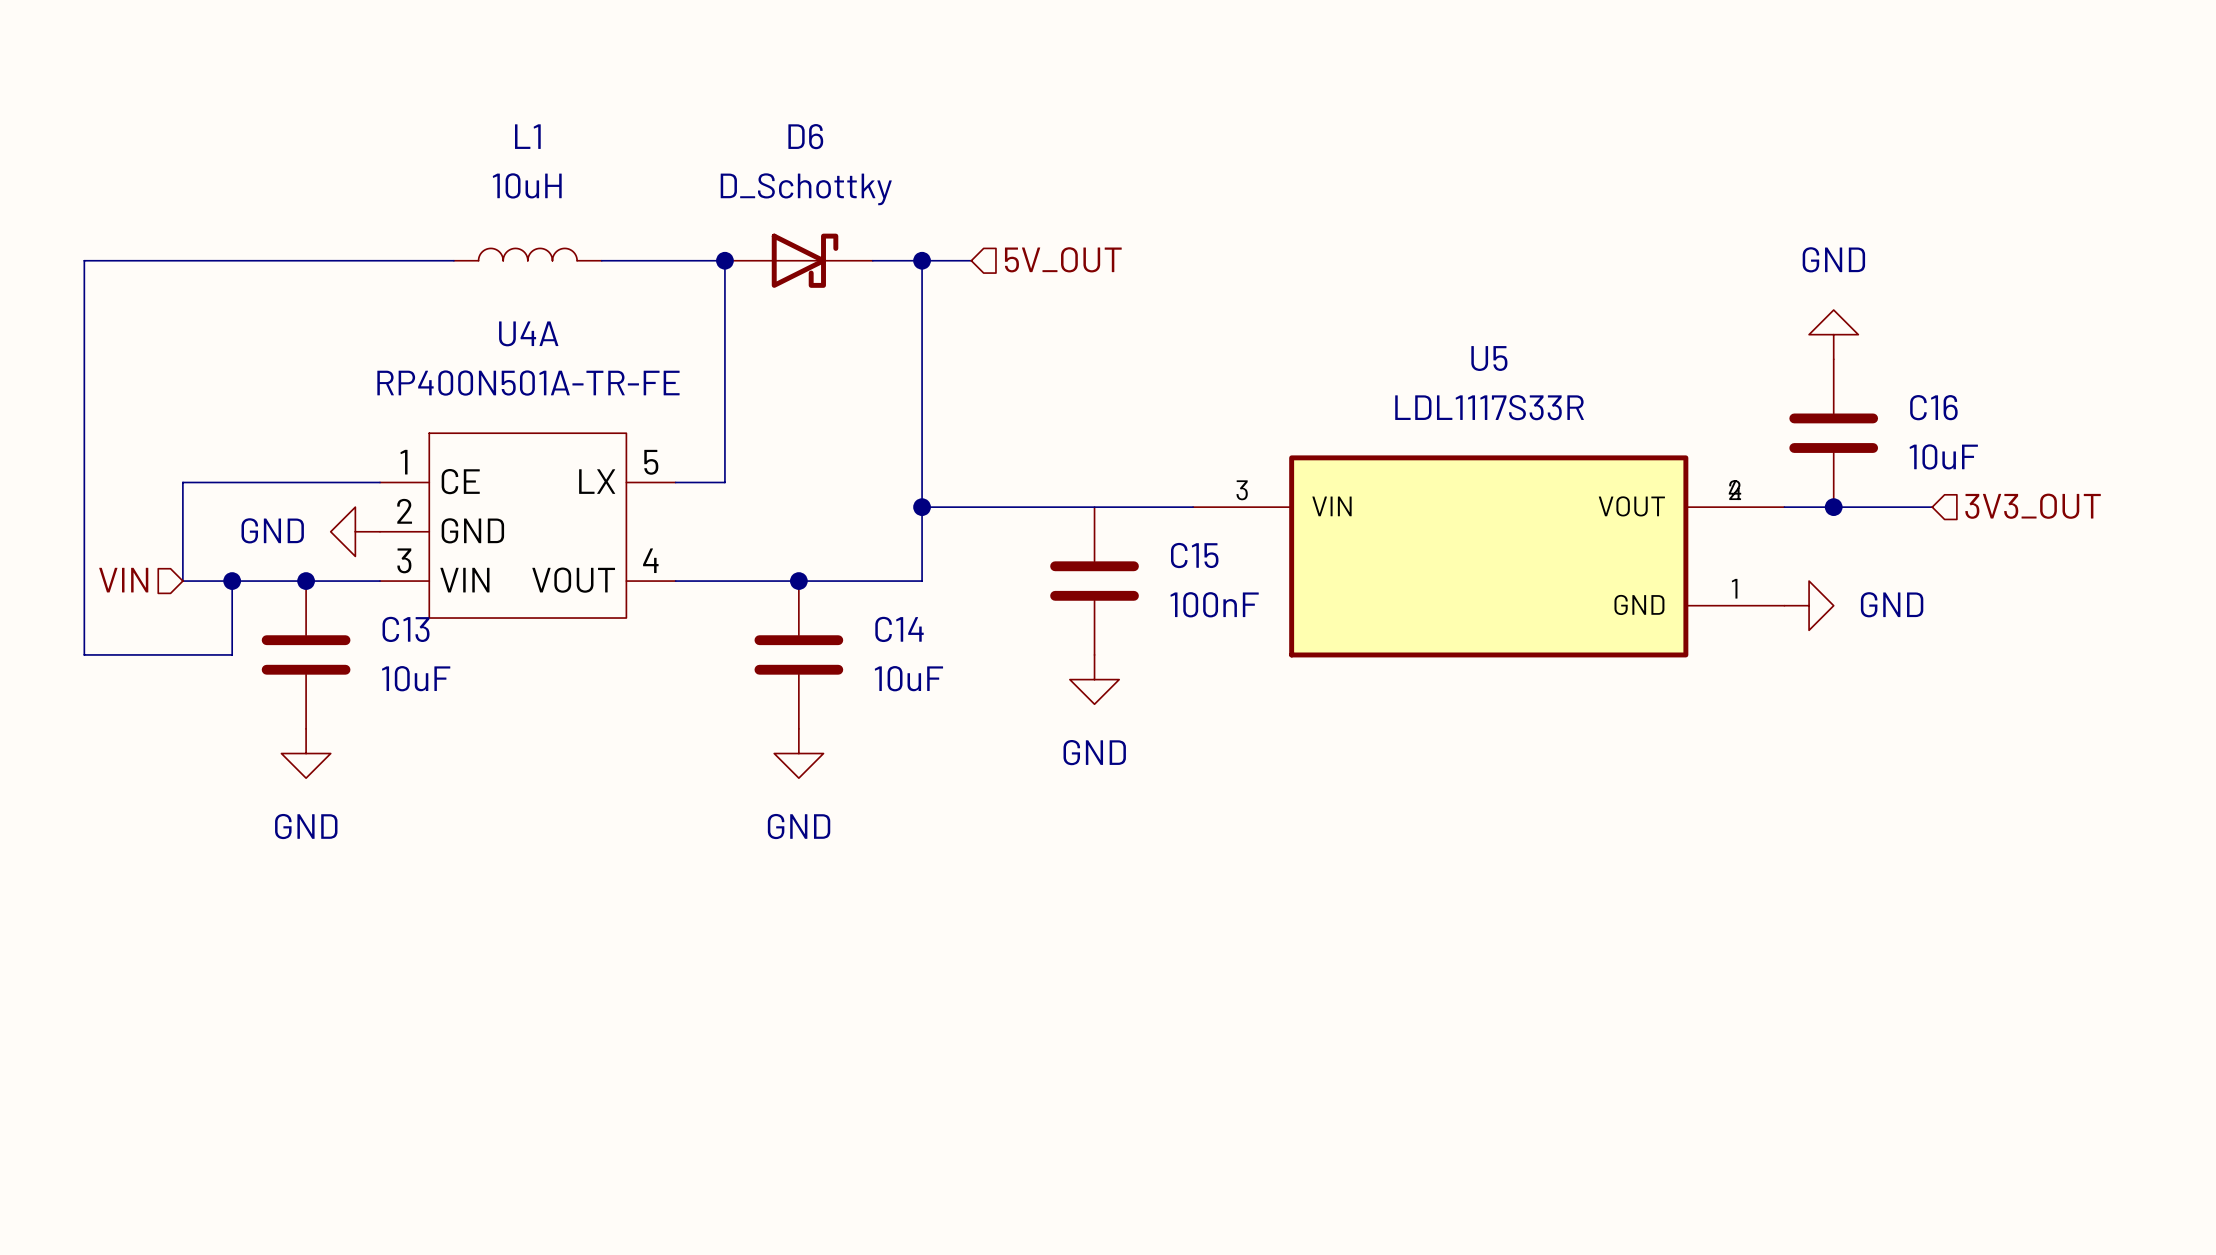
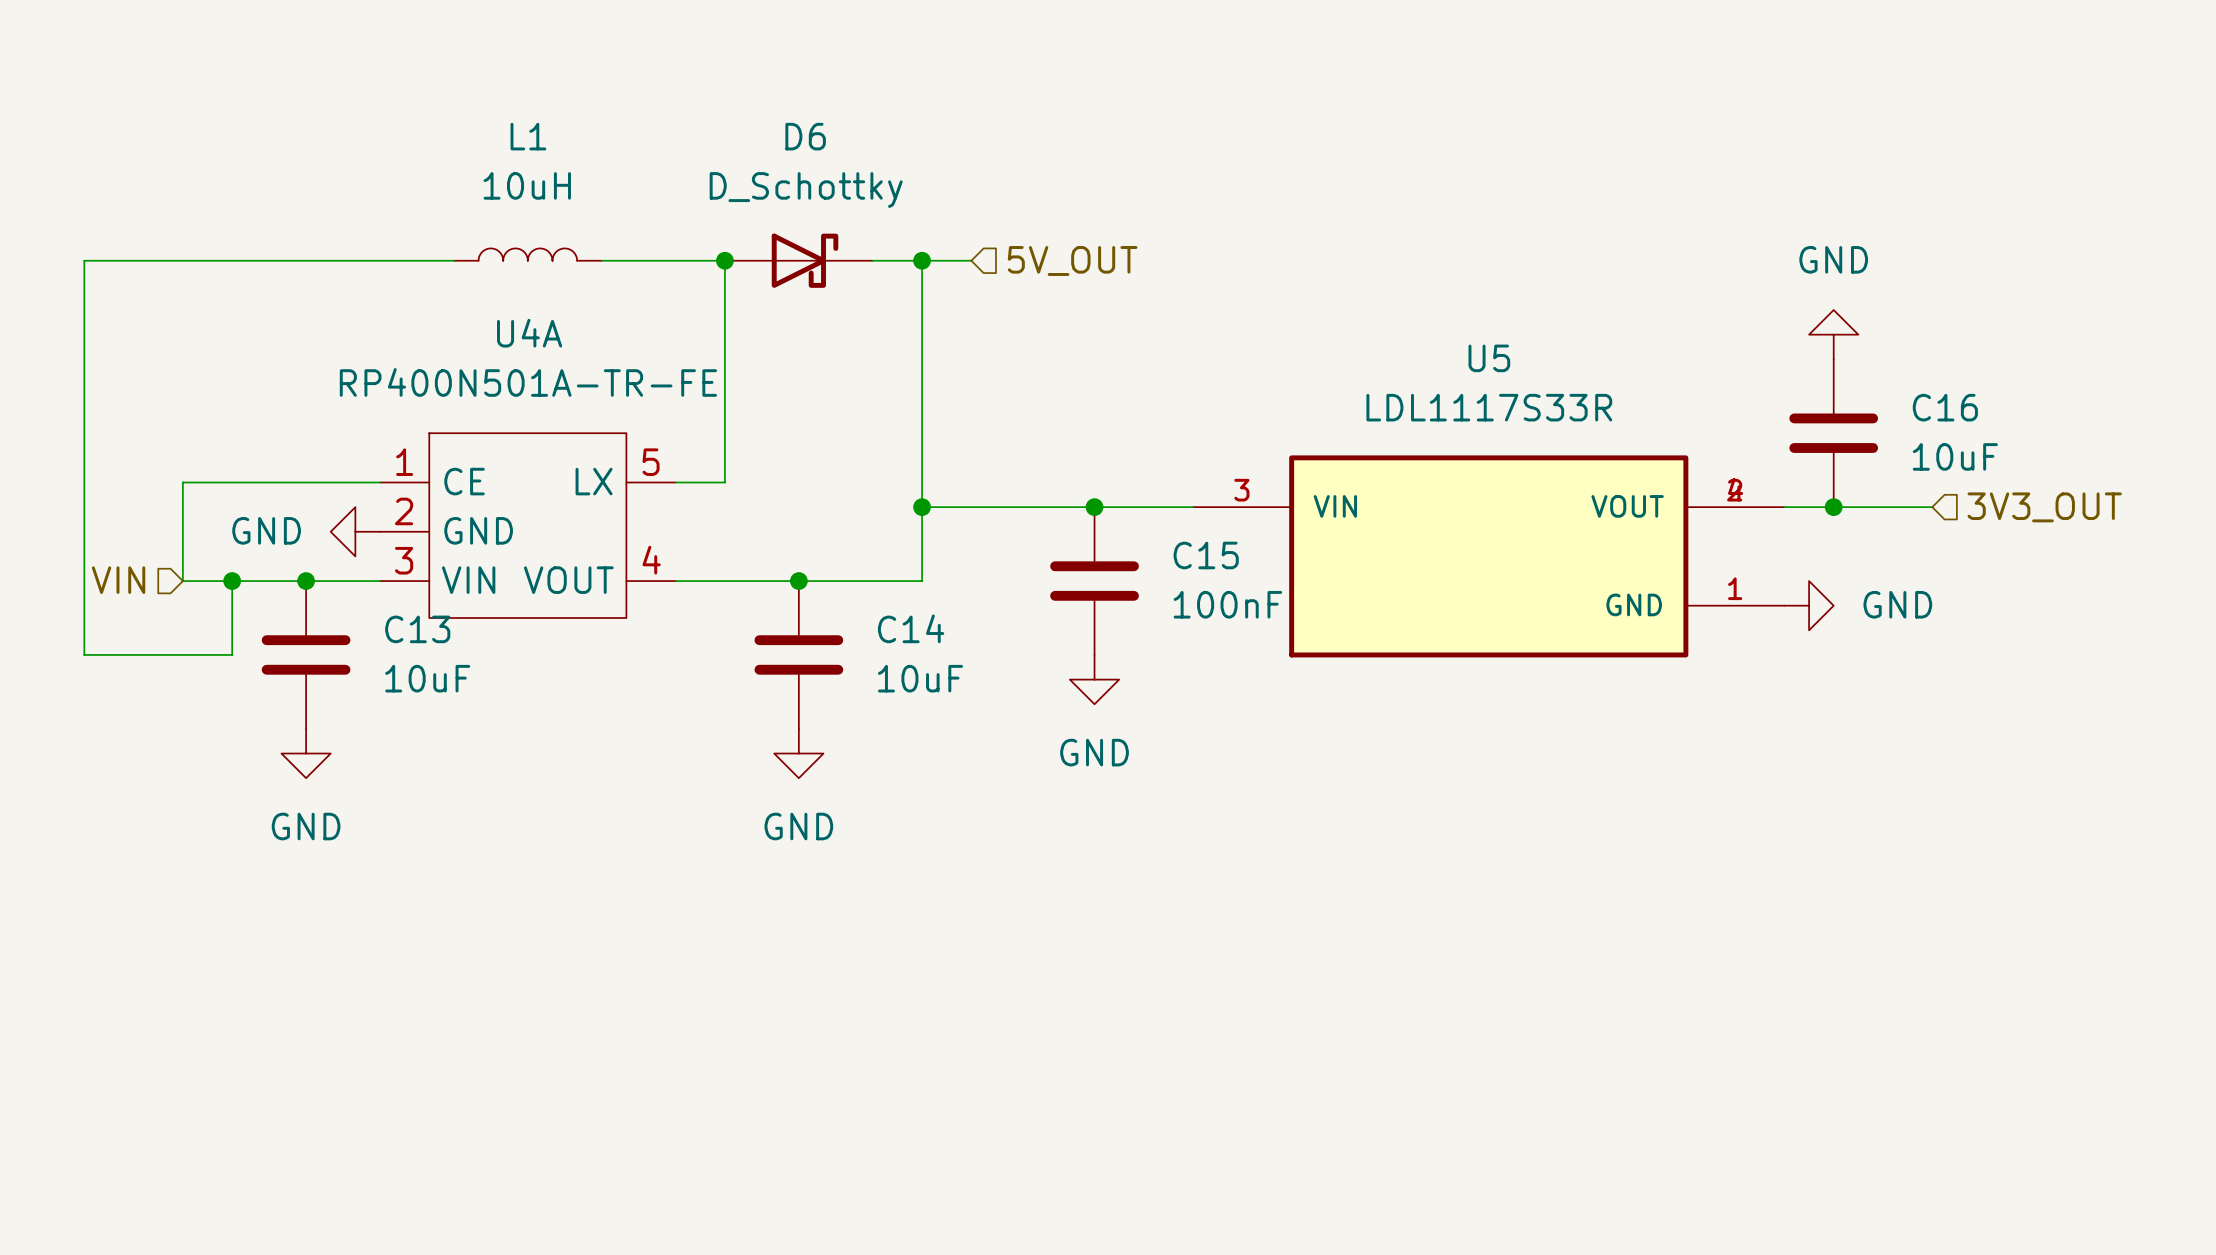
junction: none -> (1094, 507)

